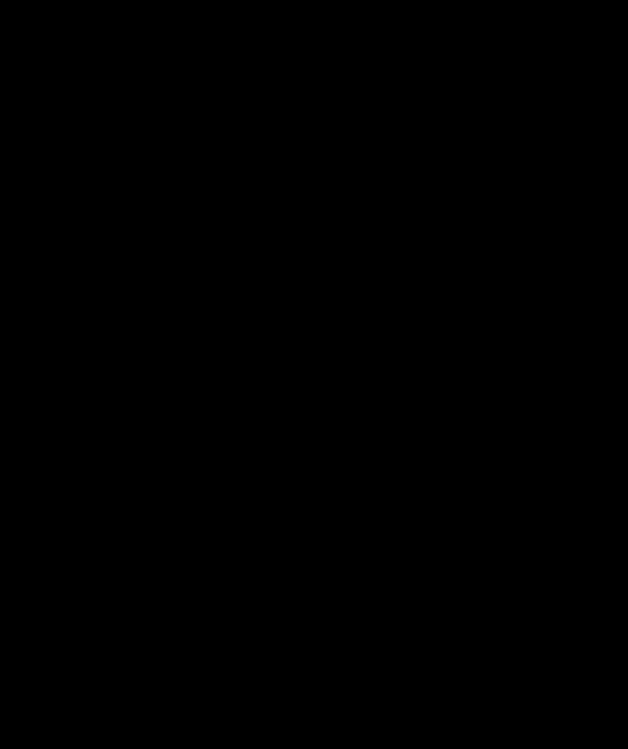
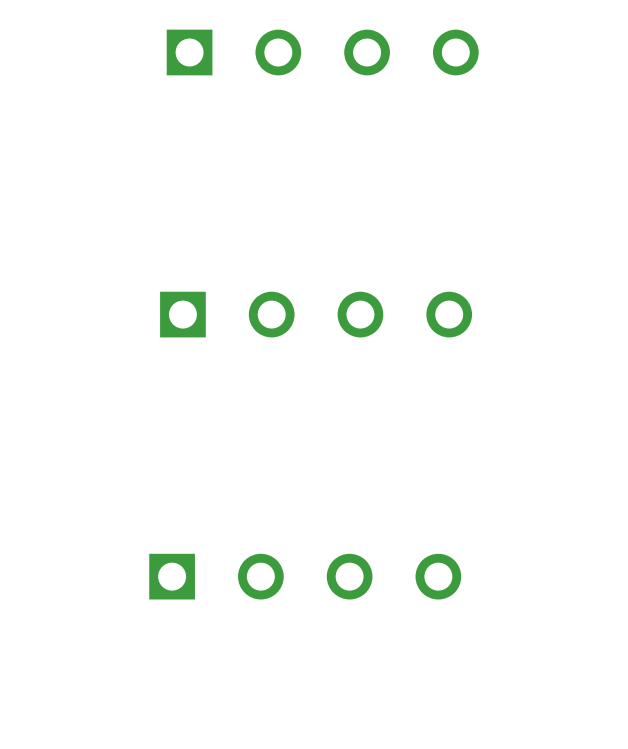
part: none -> (322, 52)
part: none -> (316, 314)
part: none -> (305, 576)

